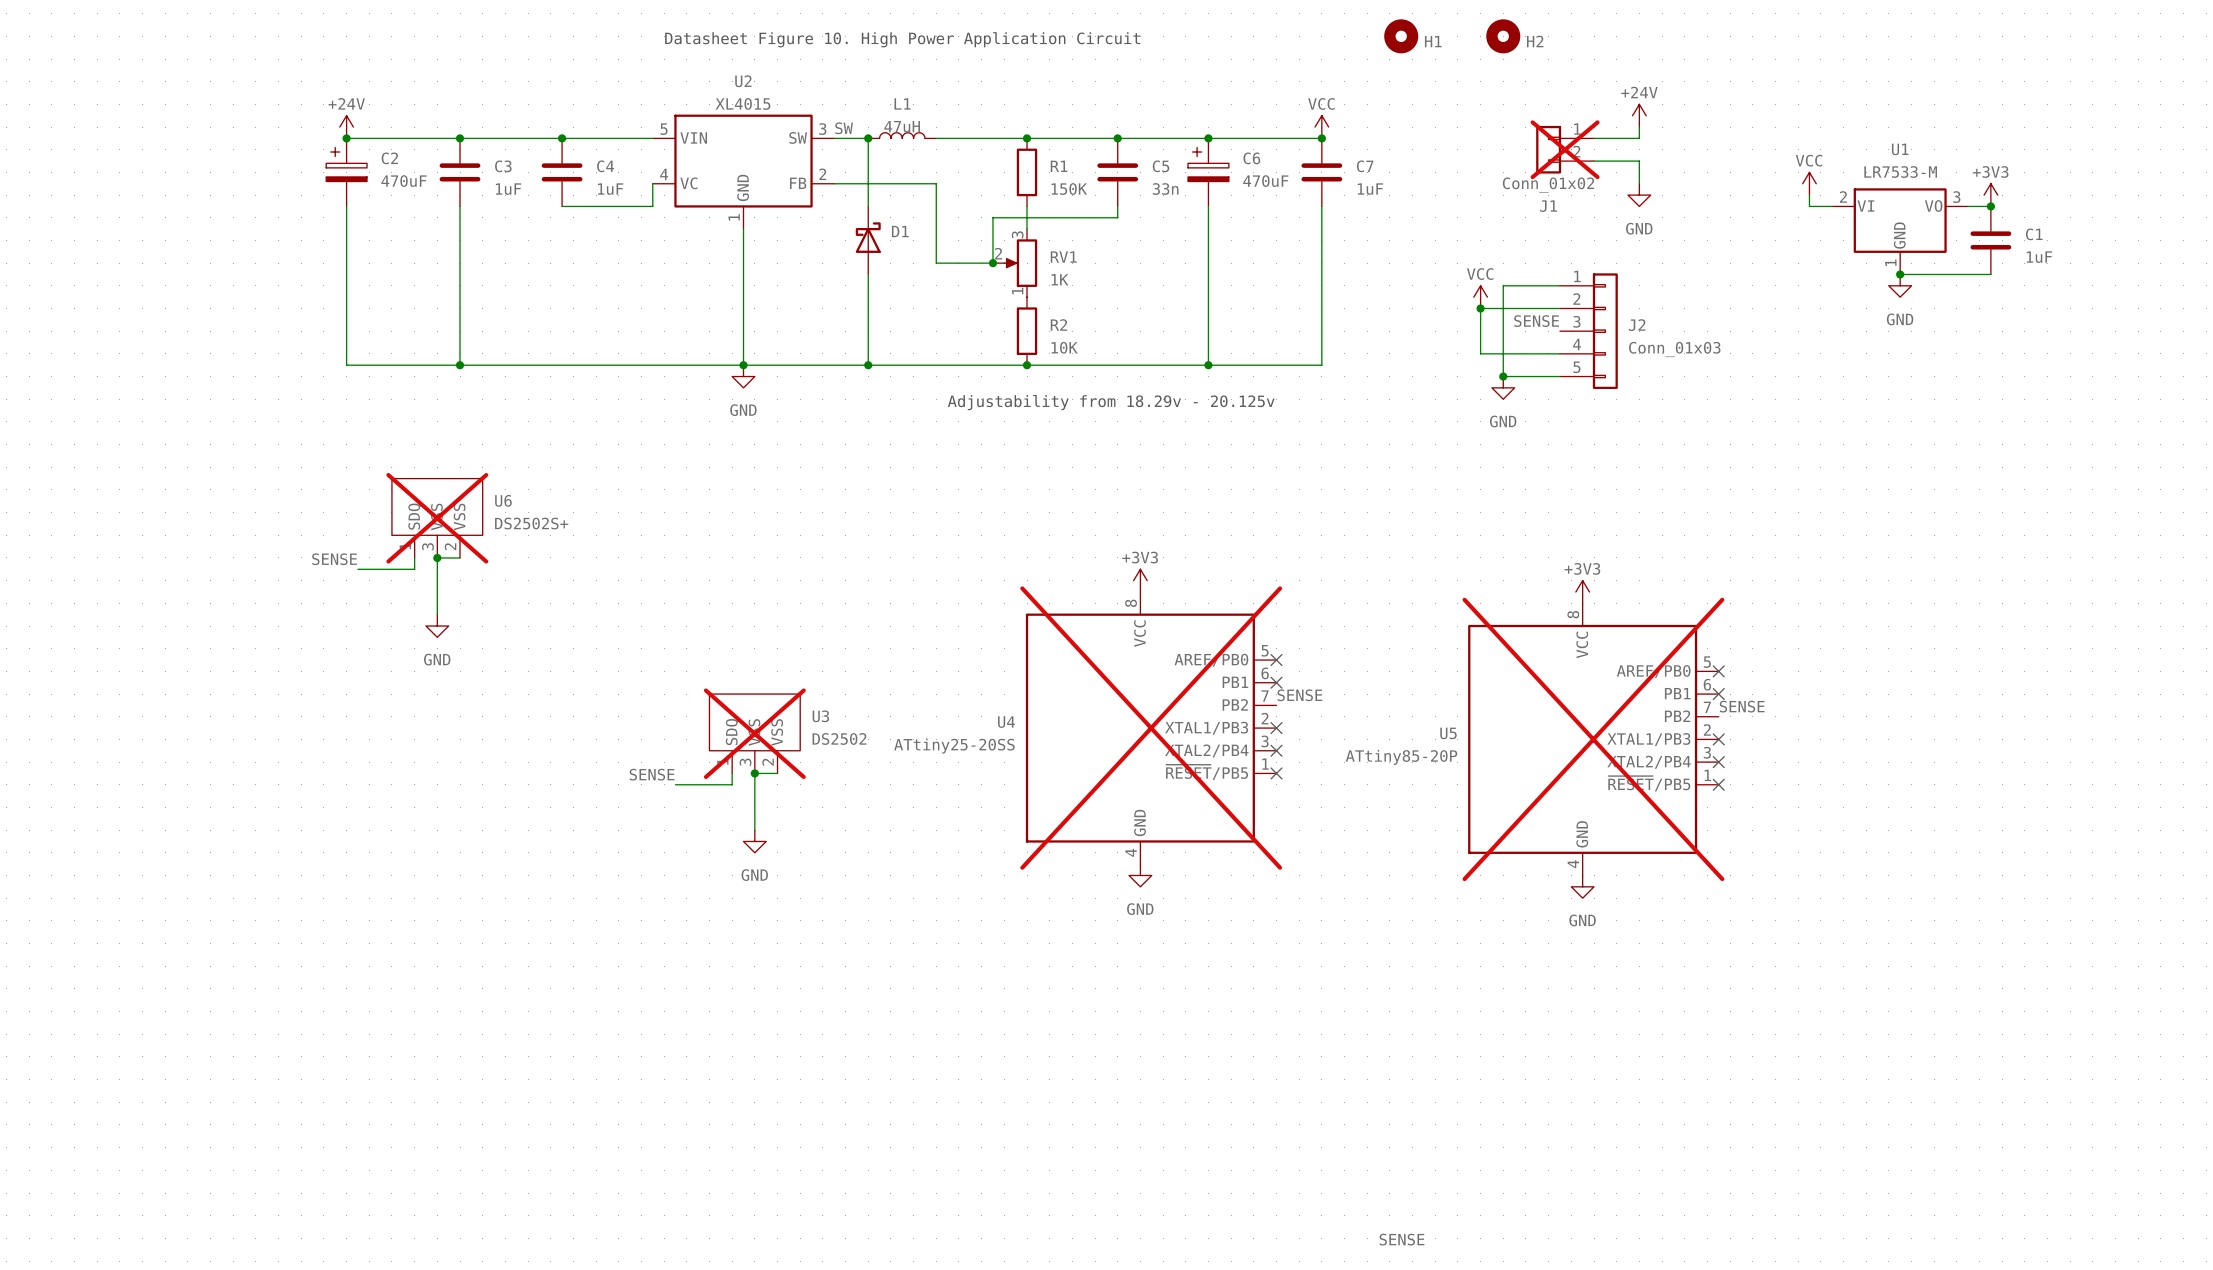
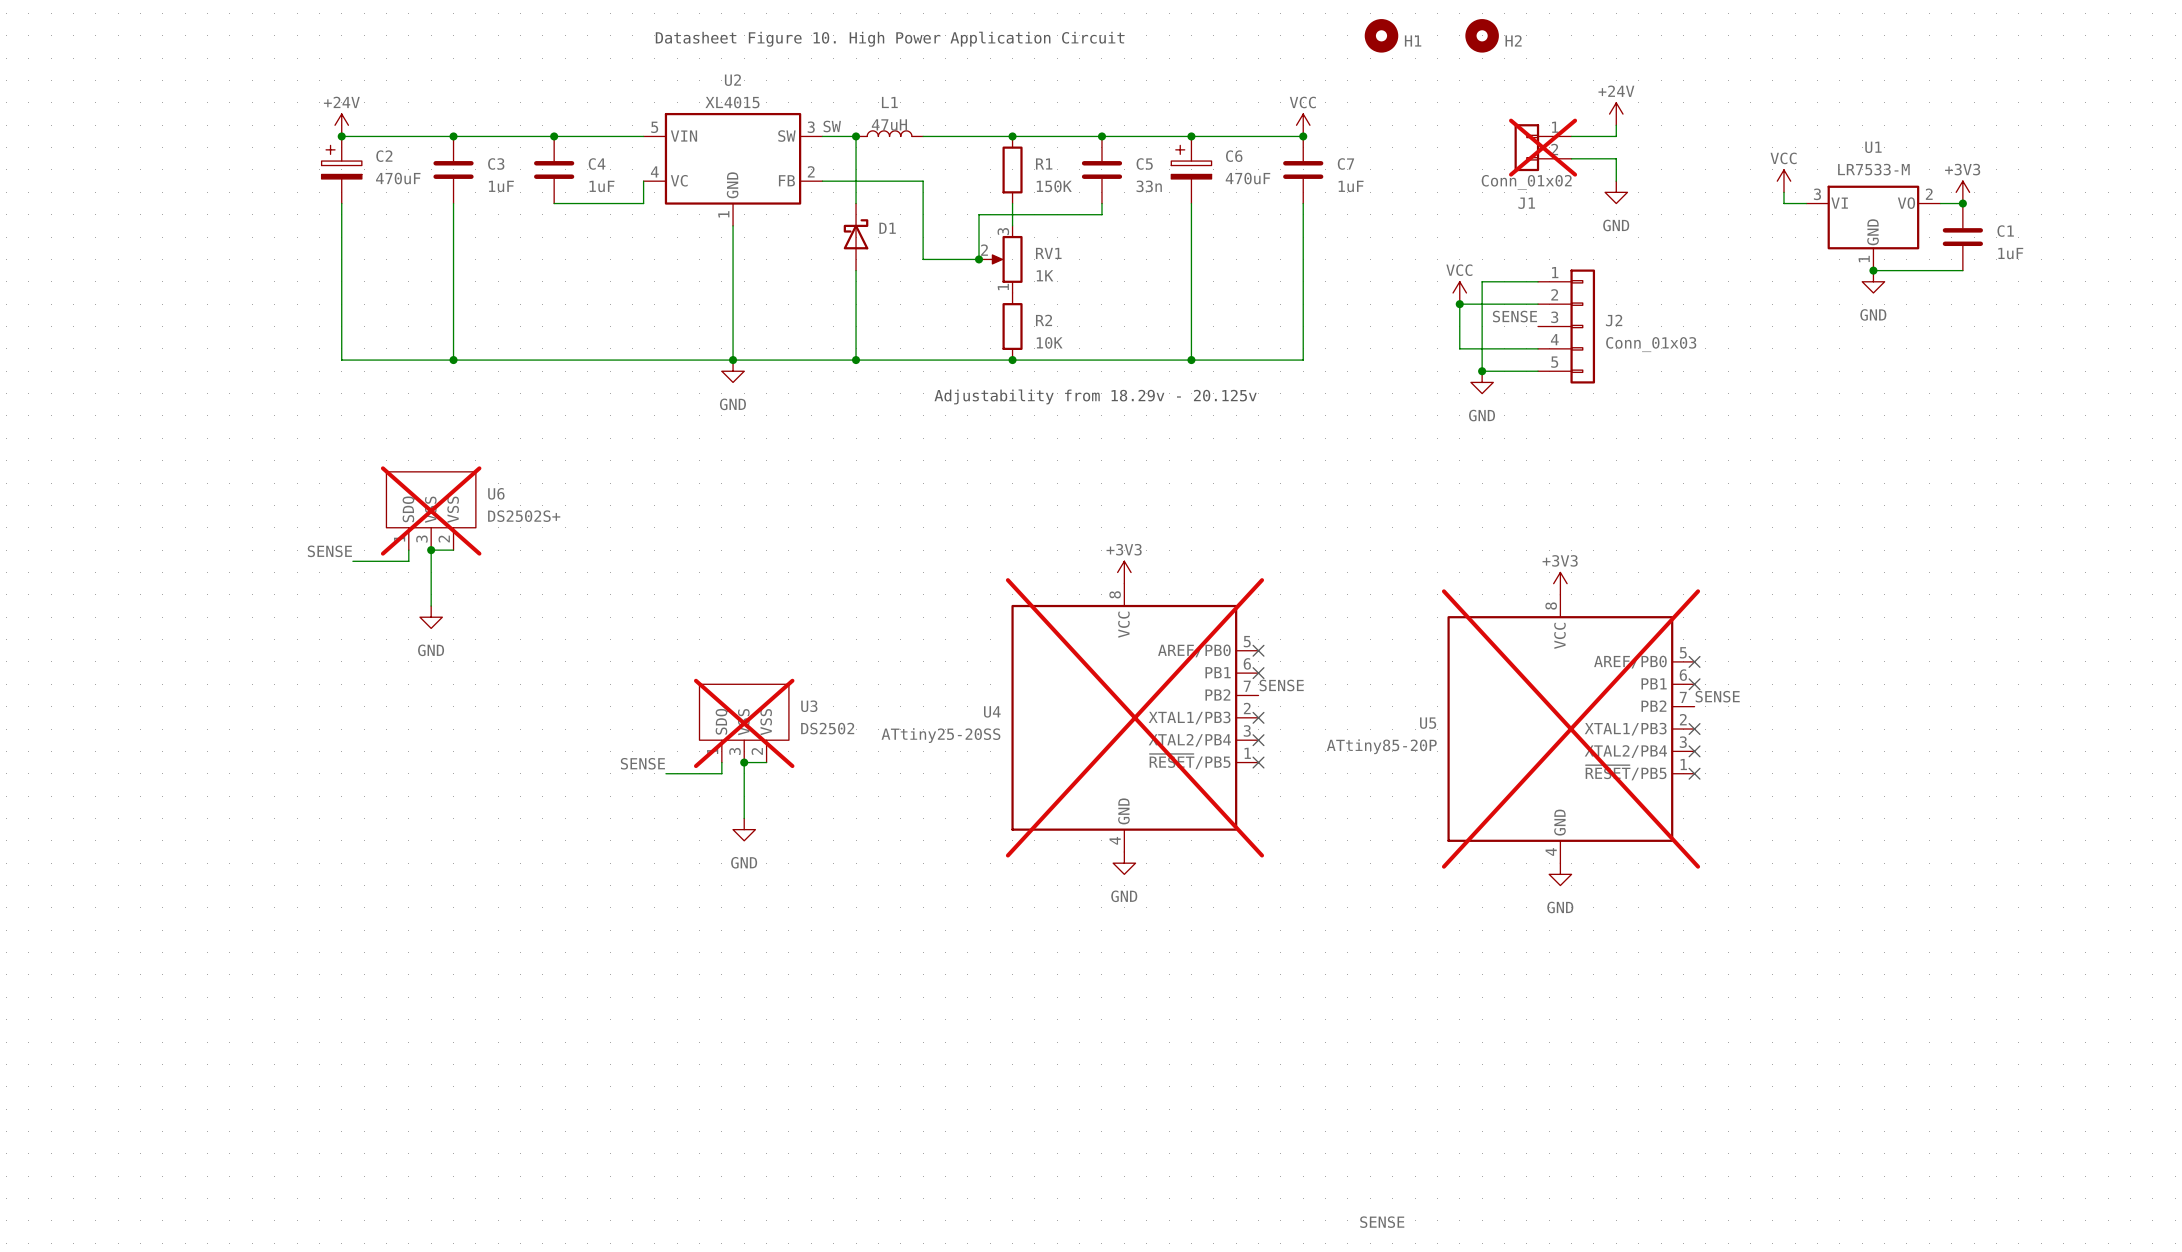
U1 pin number: 2 (1843, 196) -> 3 (1817, 194)
U1 pin number: 3 (1956, 197) -> 2 (1929, 194)

